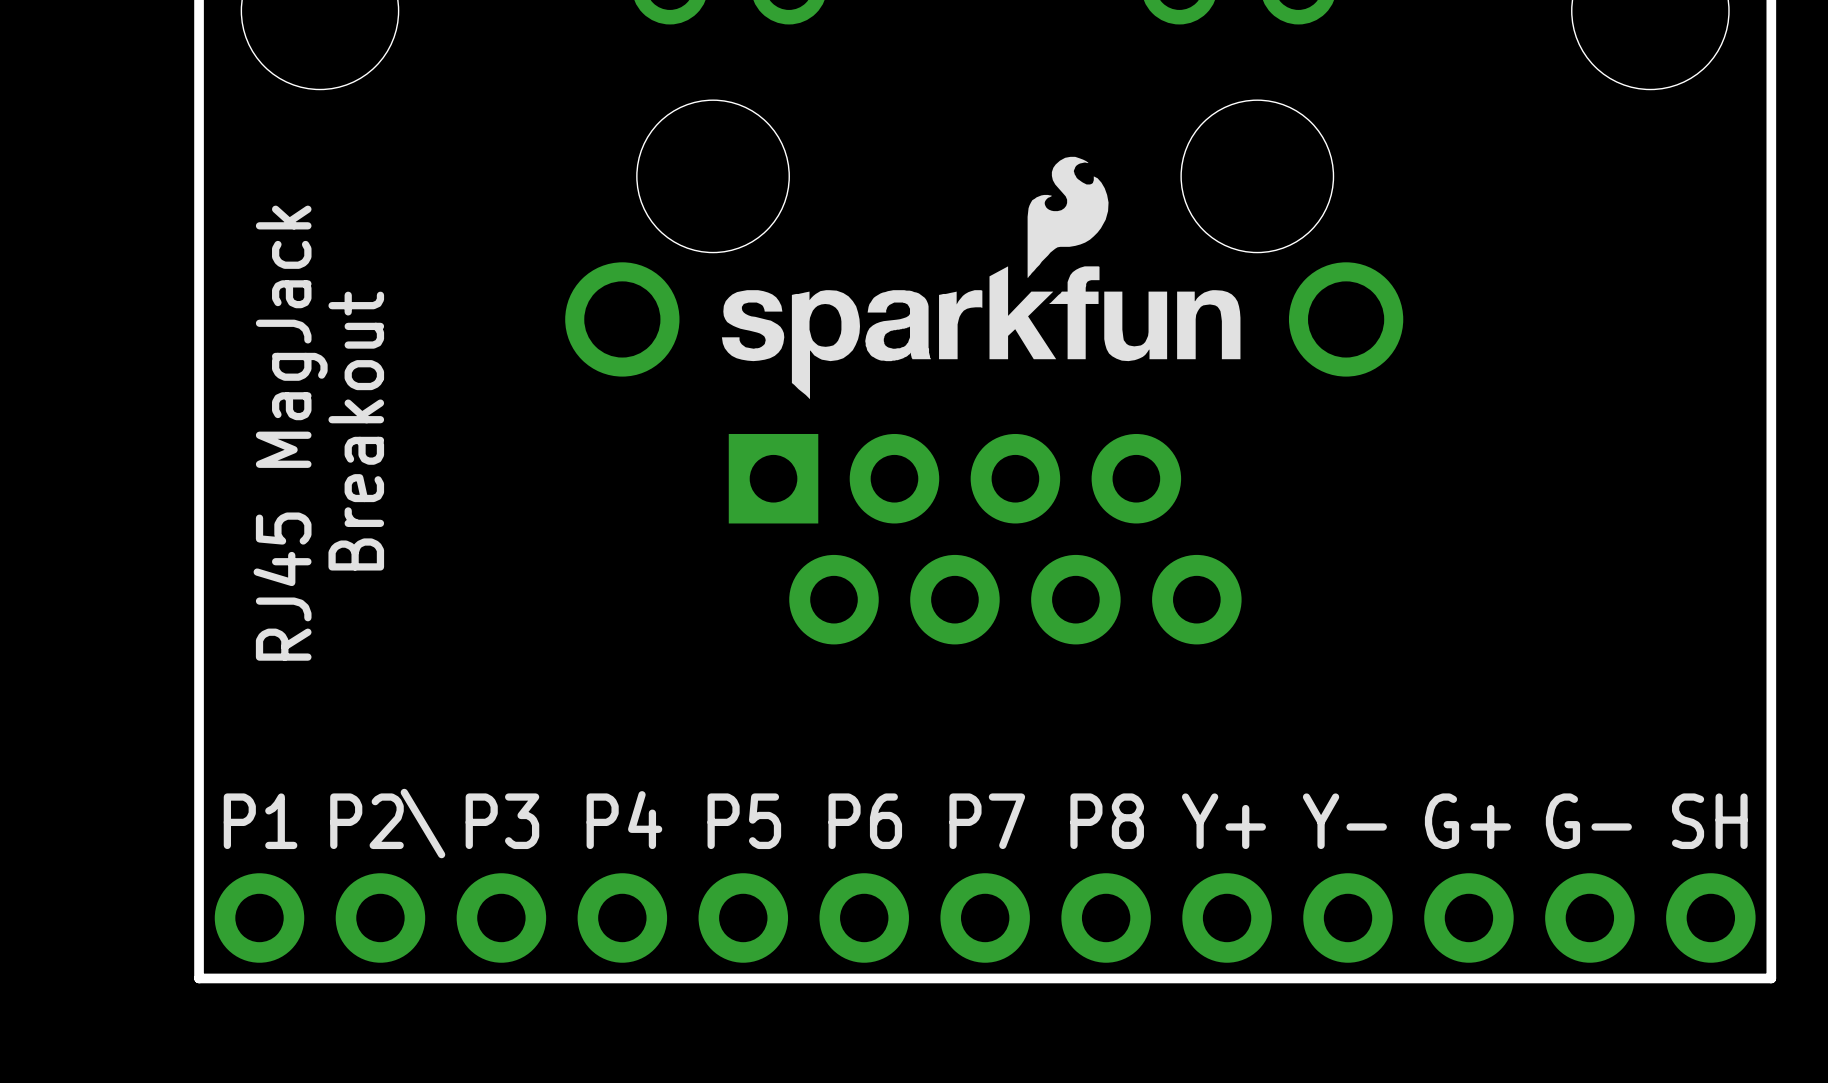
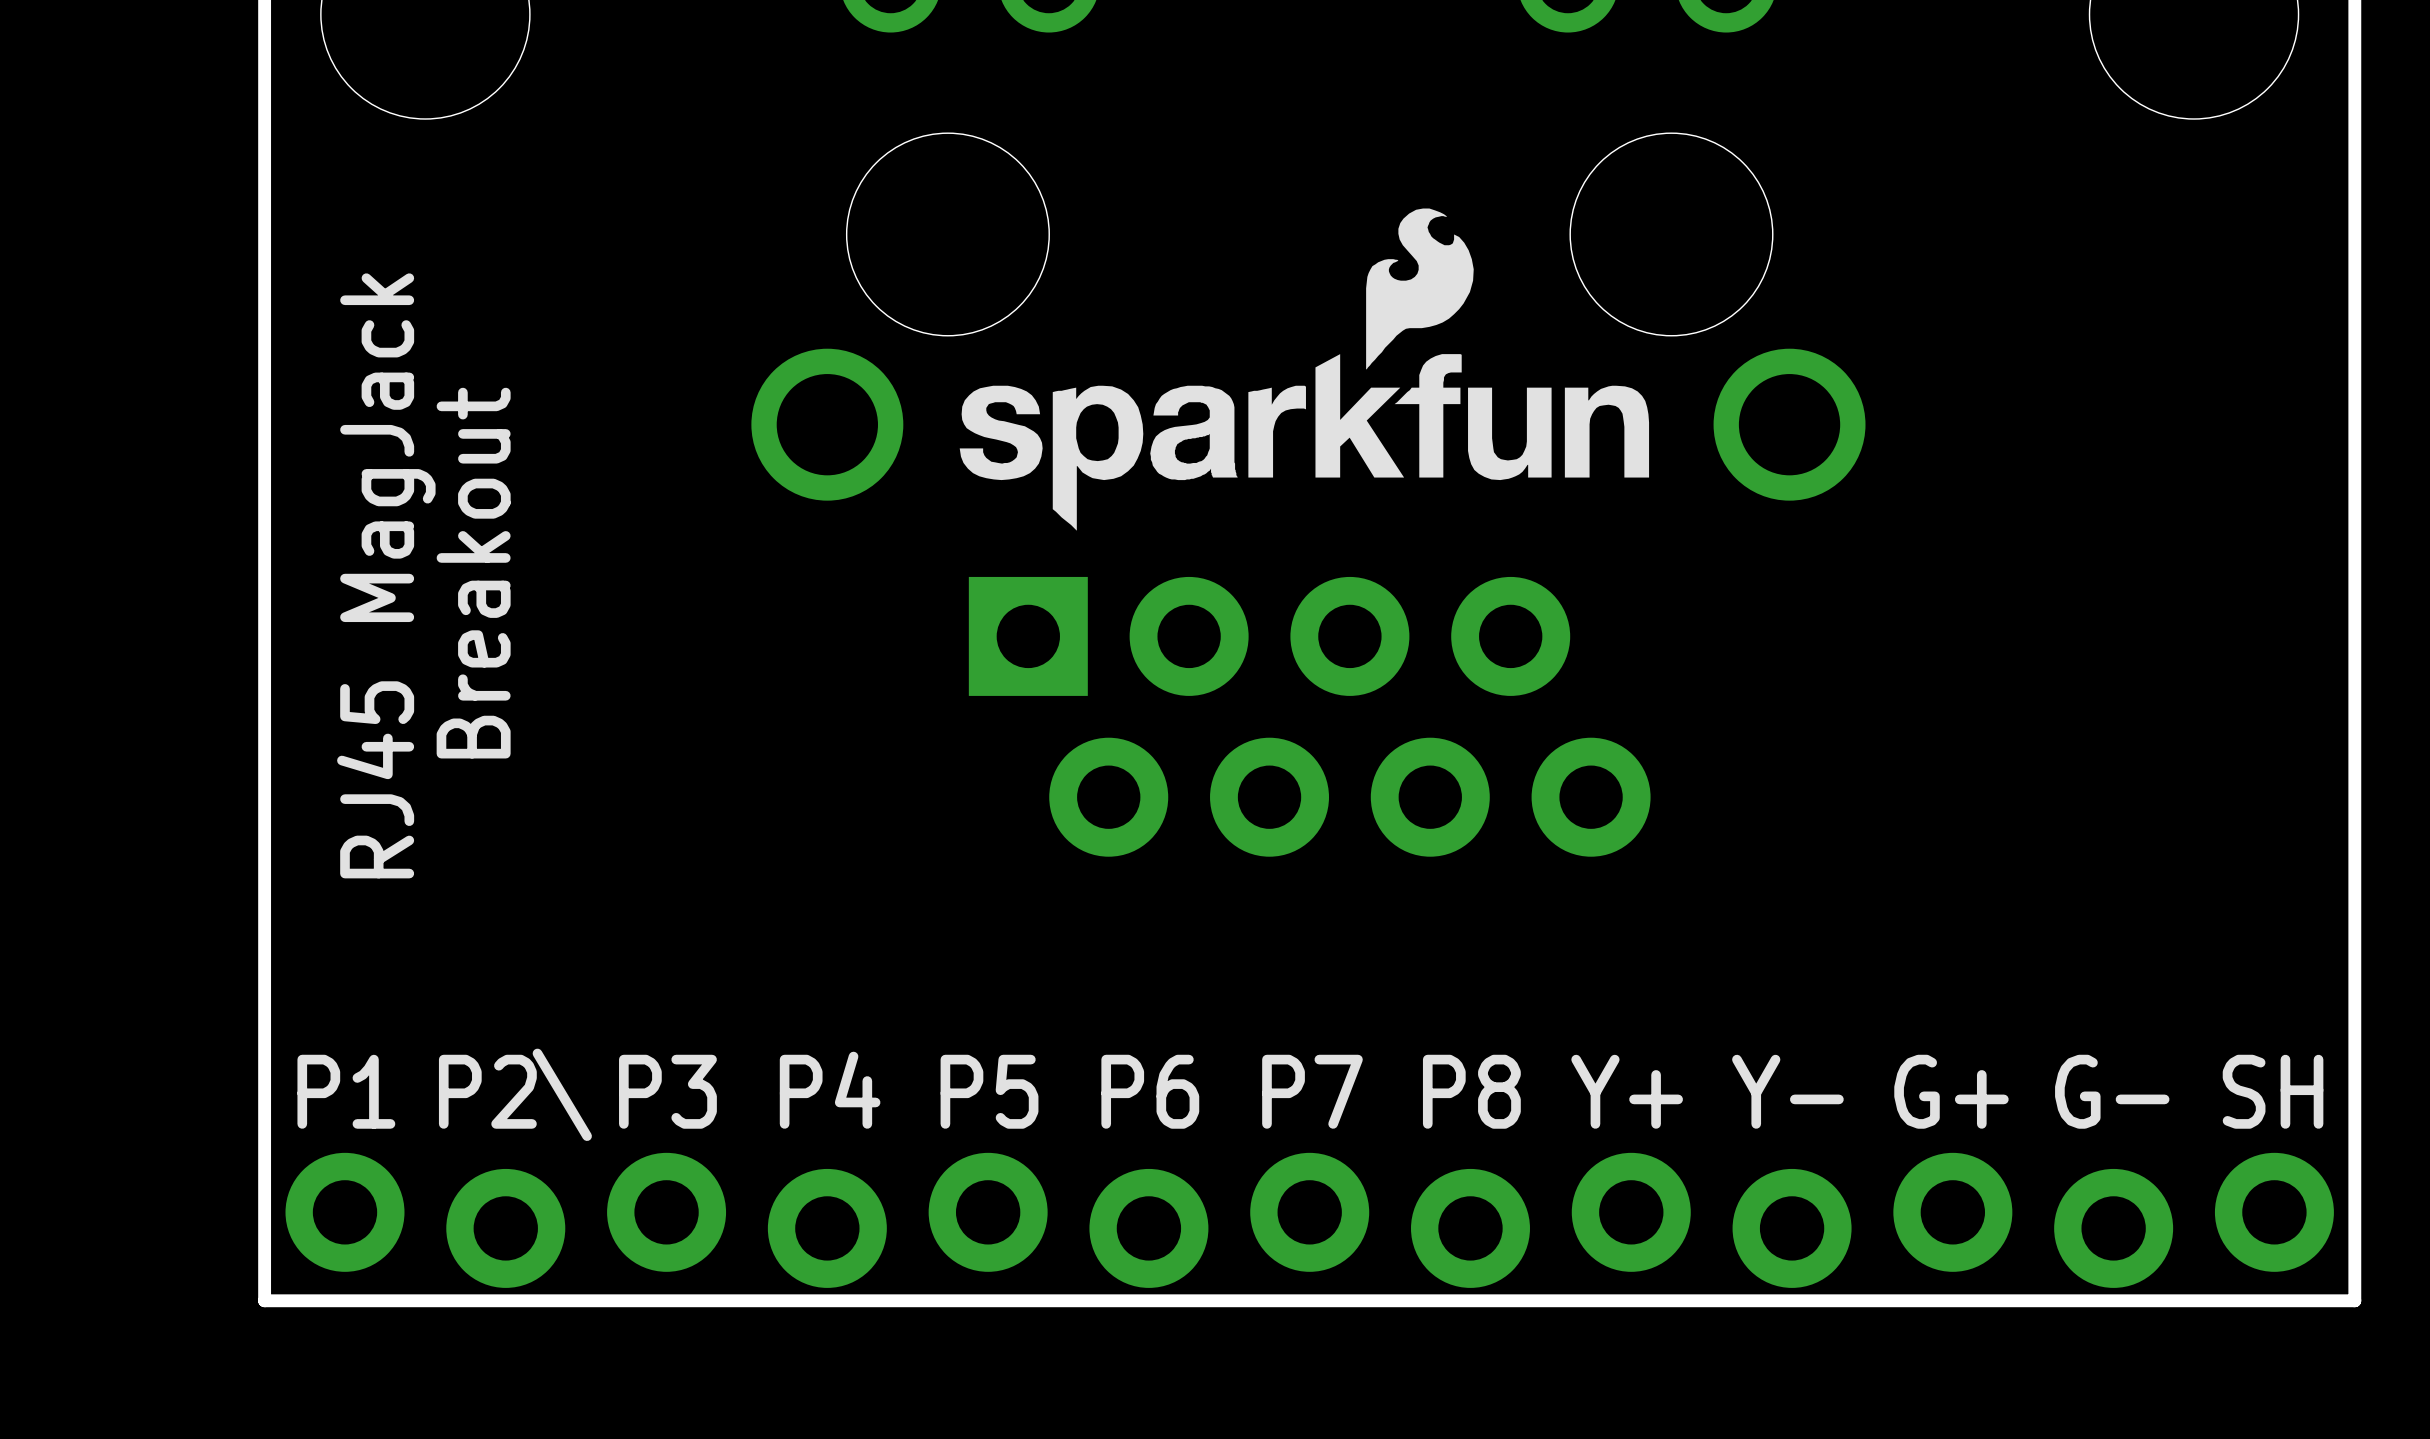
part footprint: [214, 873, 1756, 963] -> [285, 1152, 2334, 1288]

